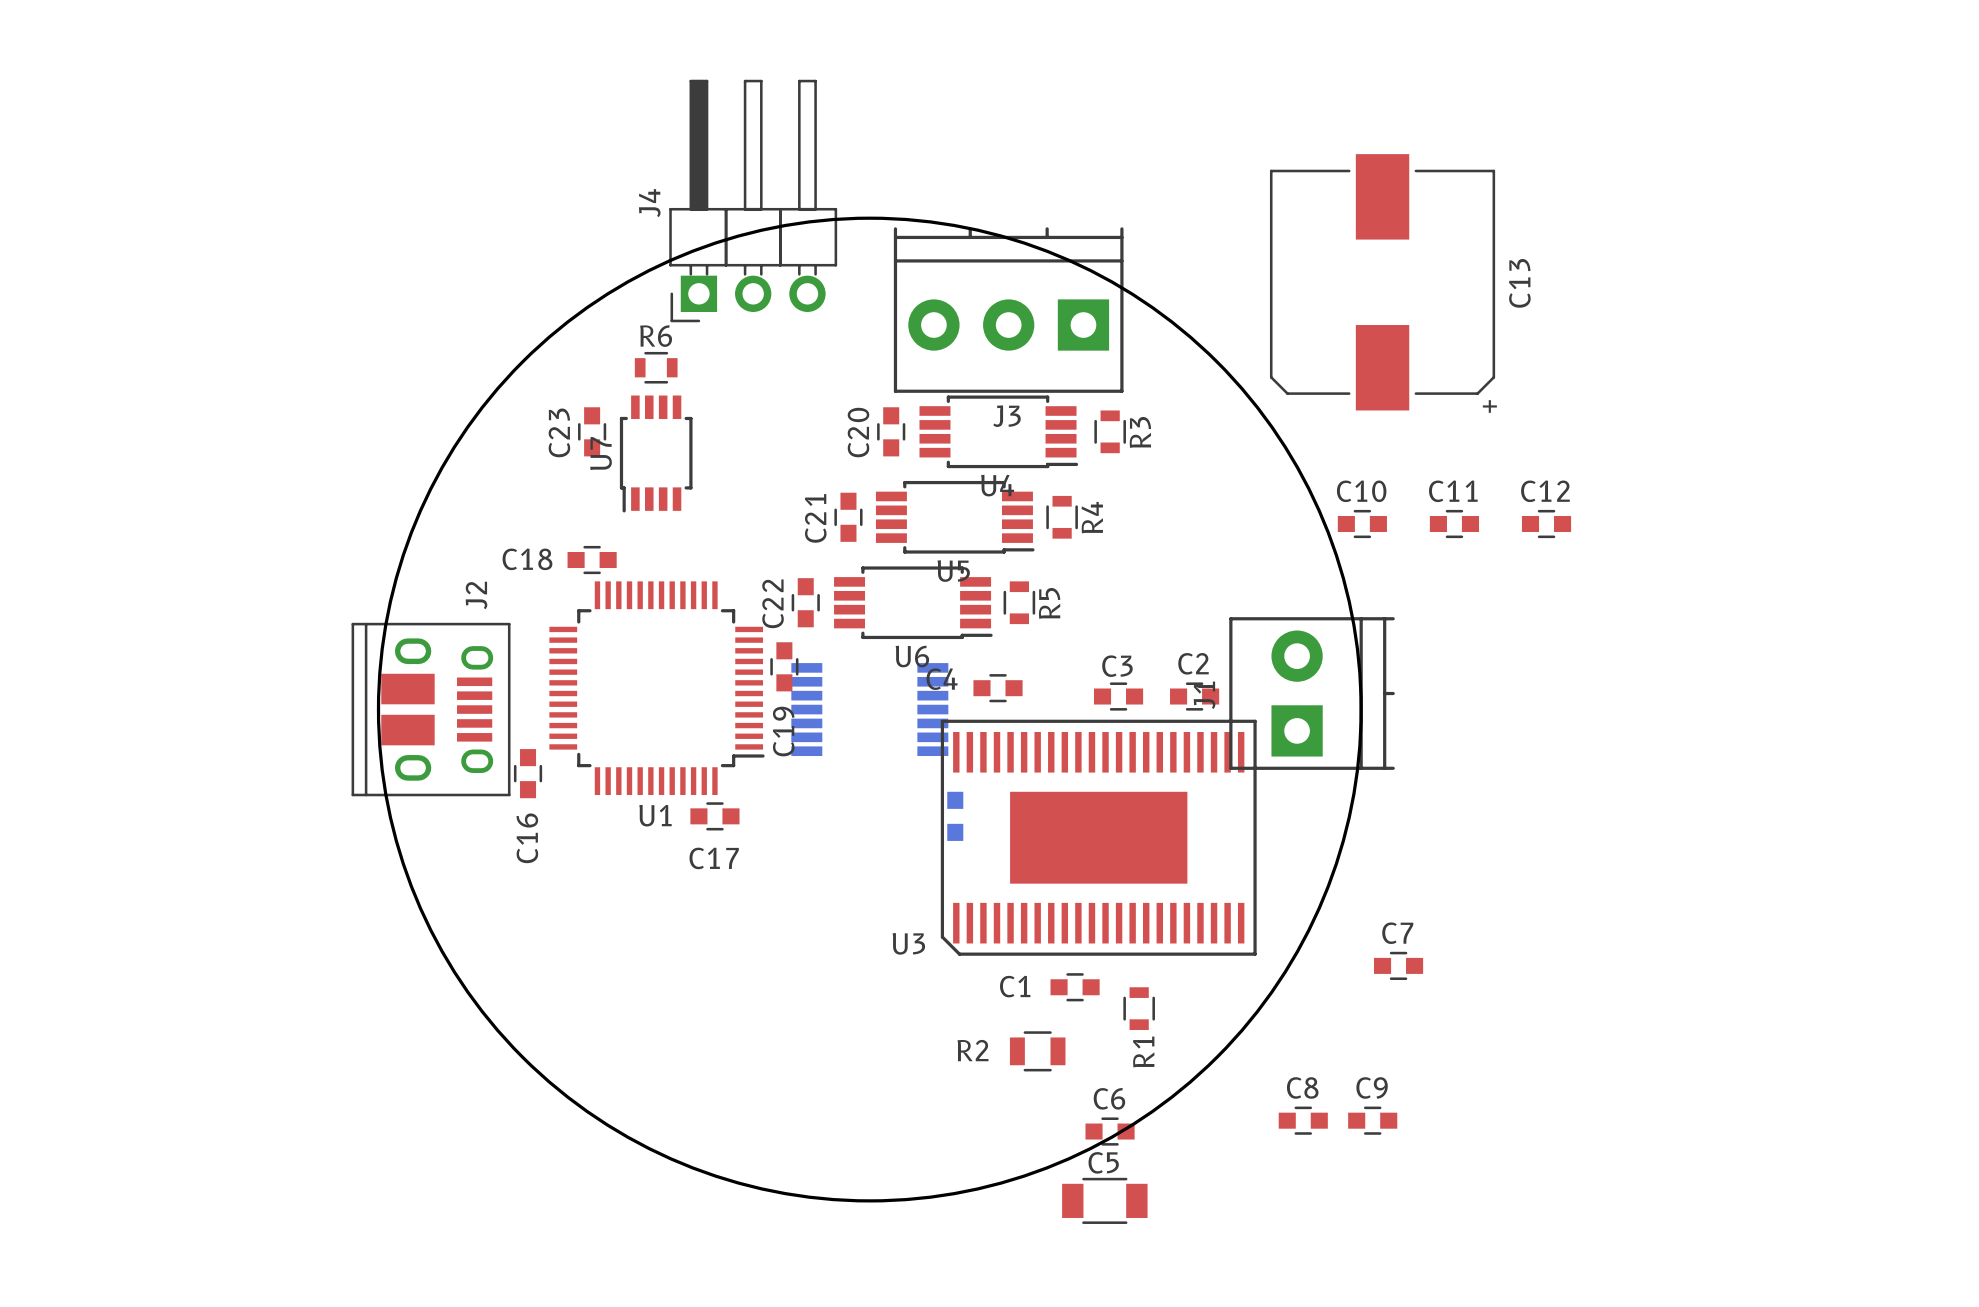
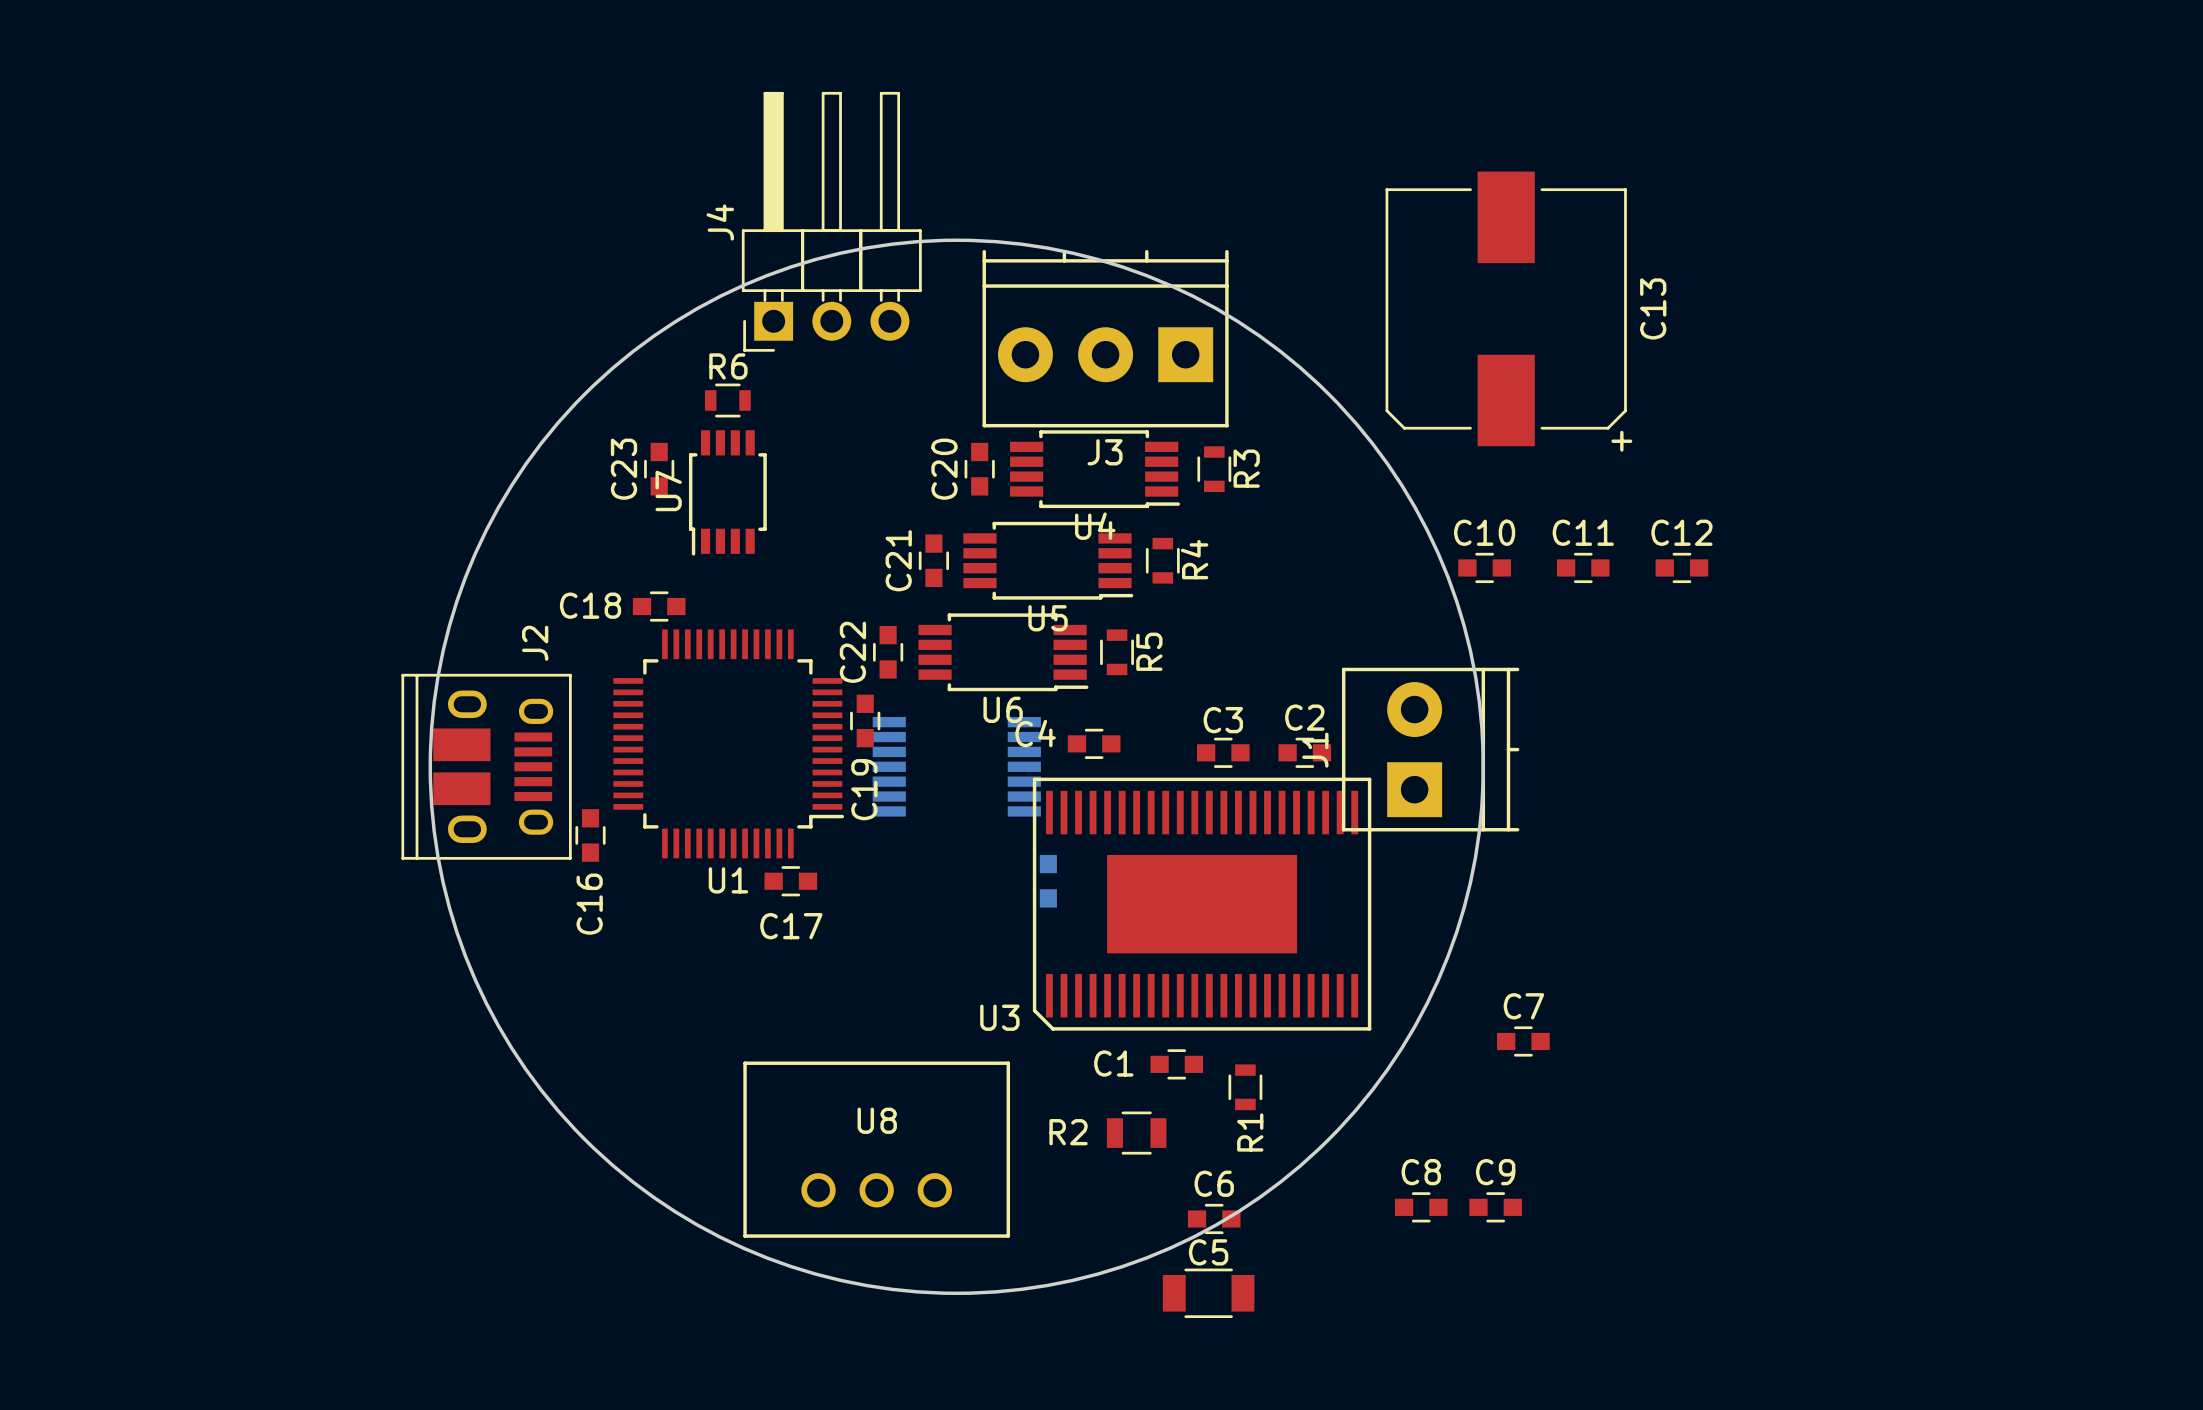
U8: none -> (876, 1149)

